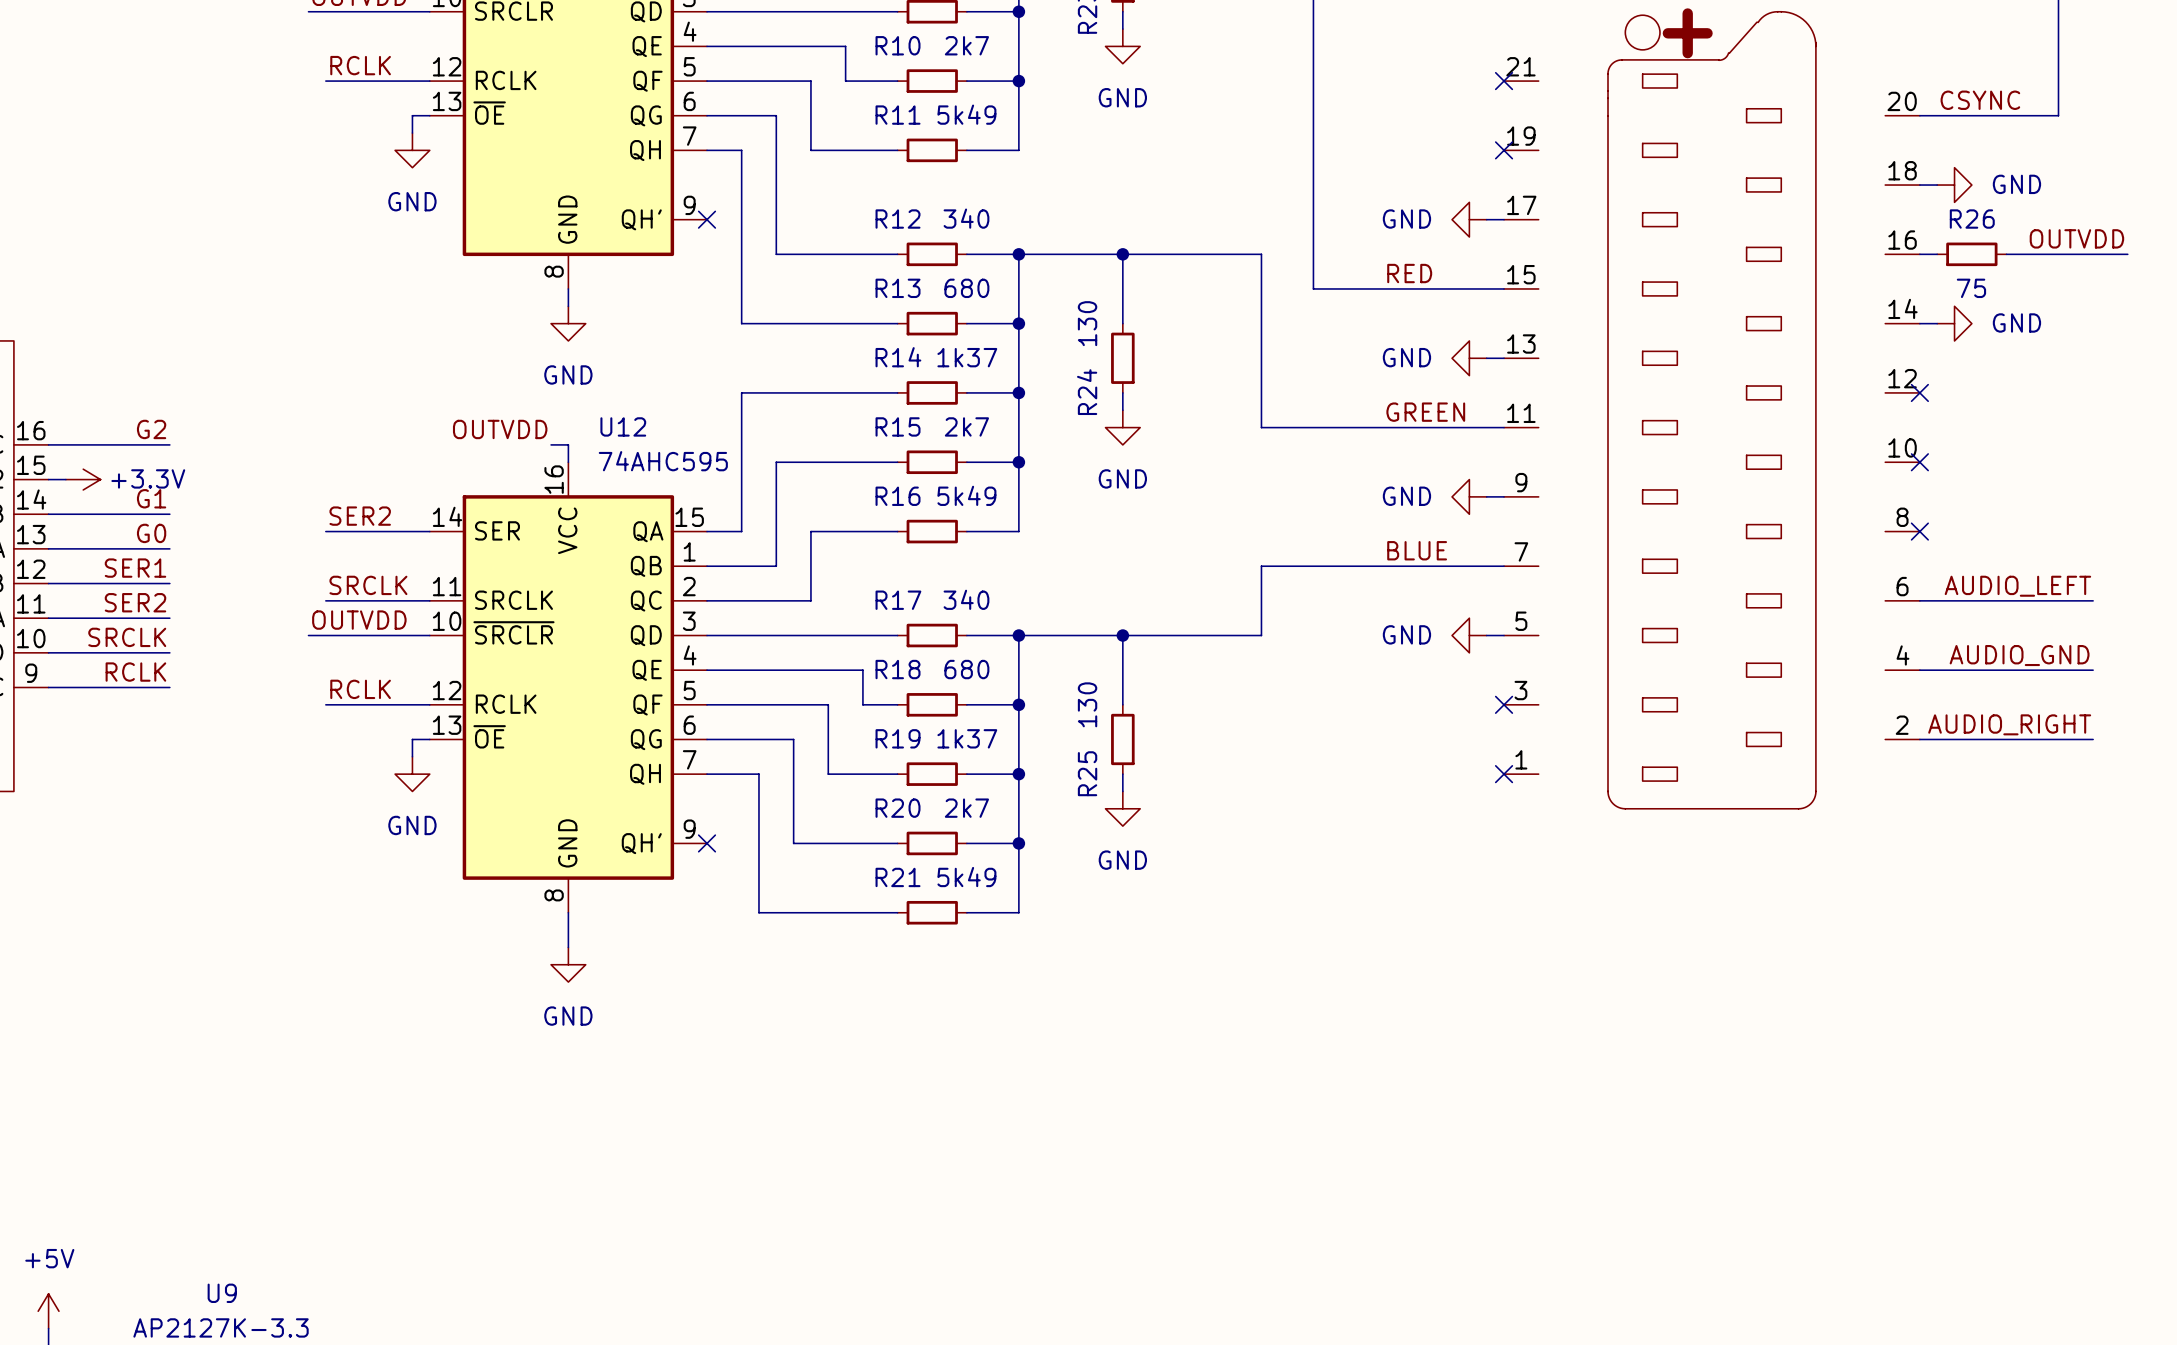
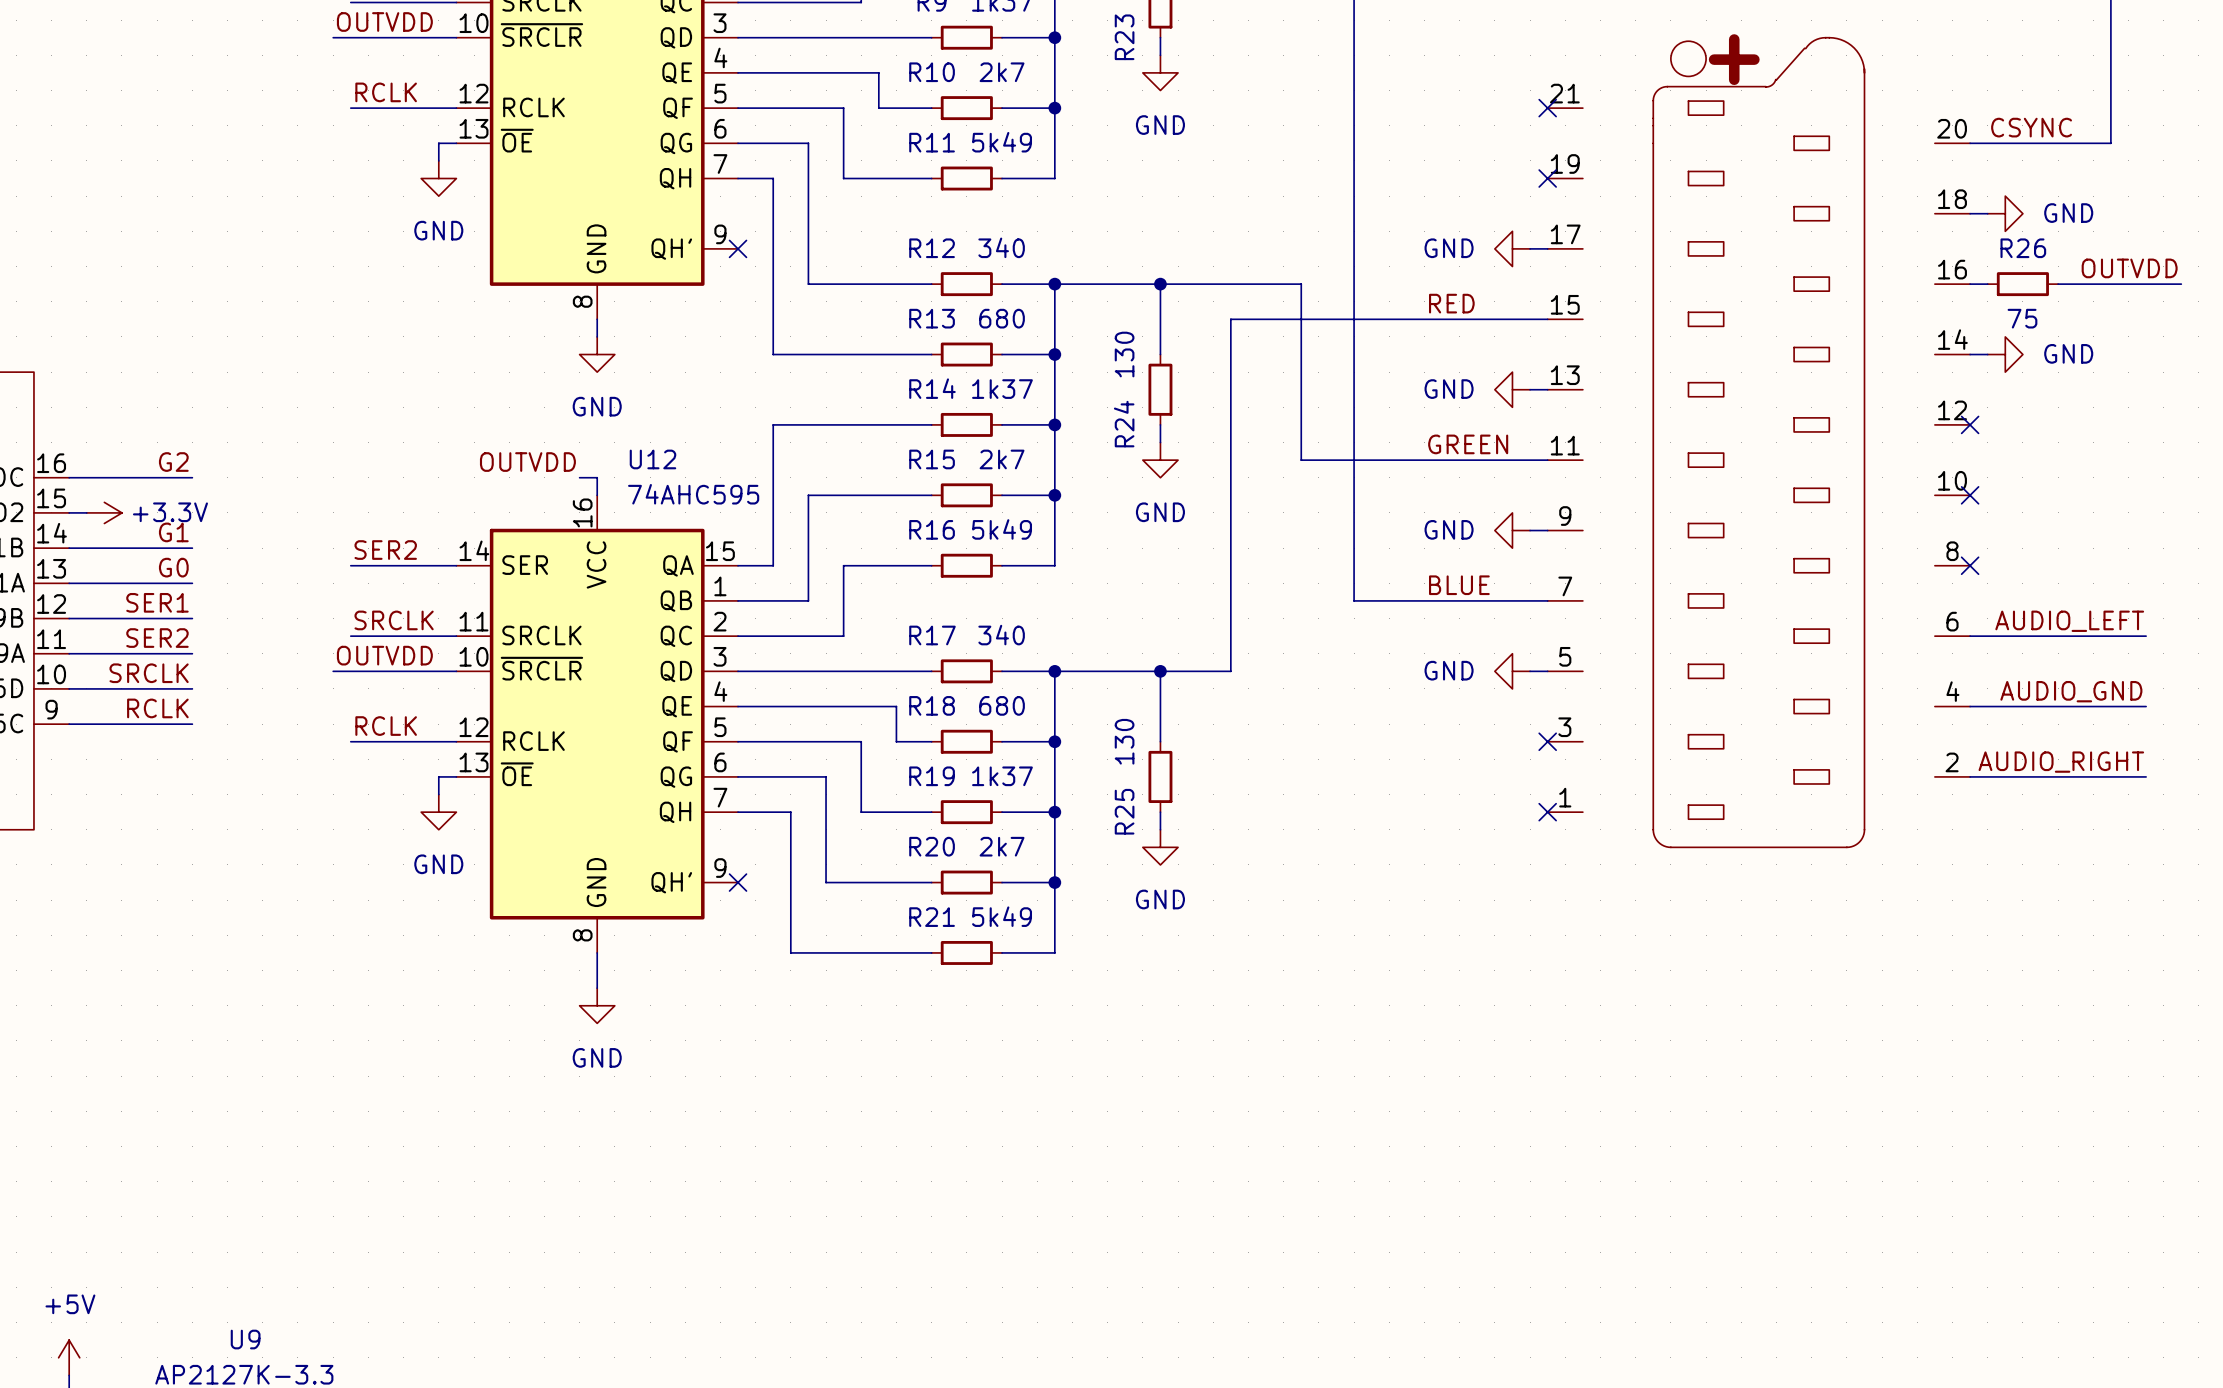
wire: (1313, 566) (1261, 566) (1261, 635) (1192, 635) -> (1354, 600) (1354, 319) (1230, 319) (1230, 671)

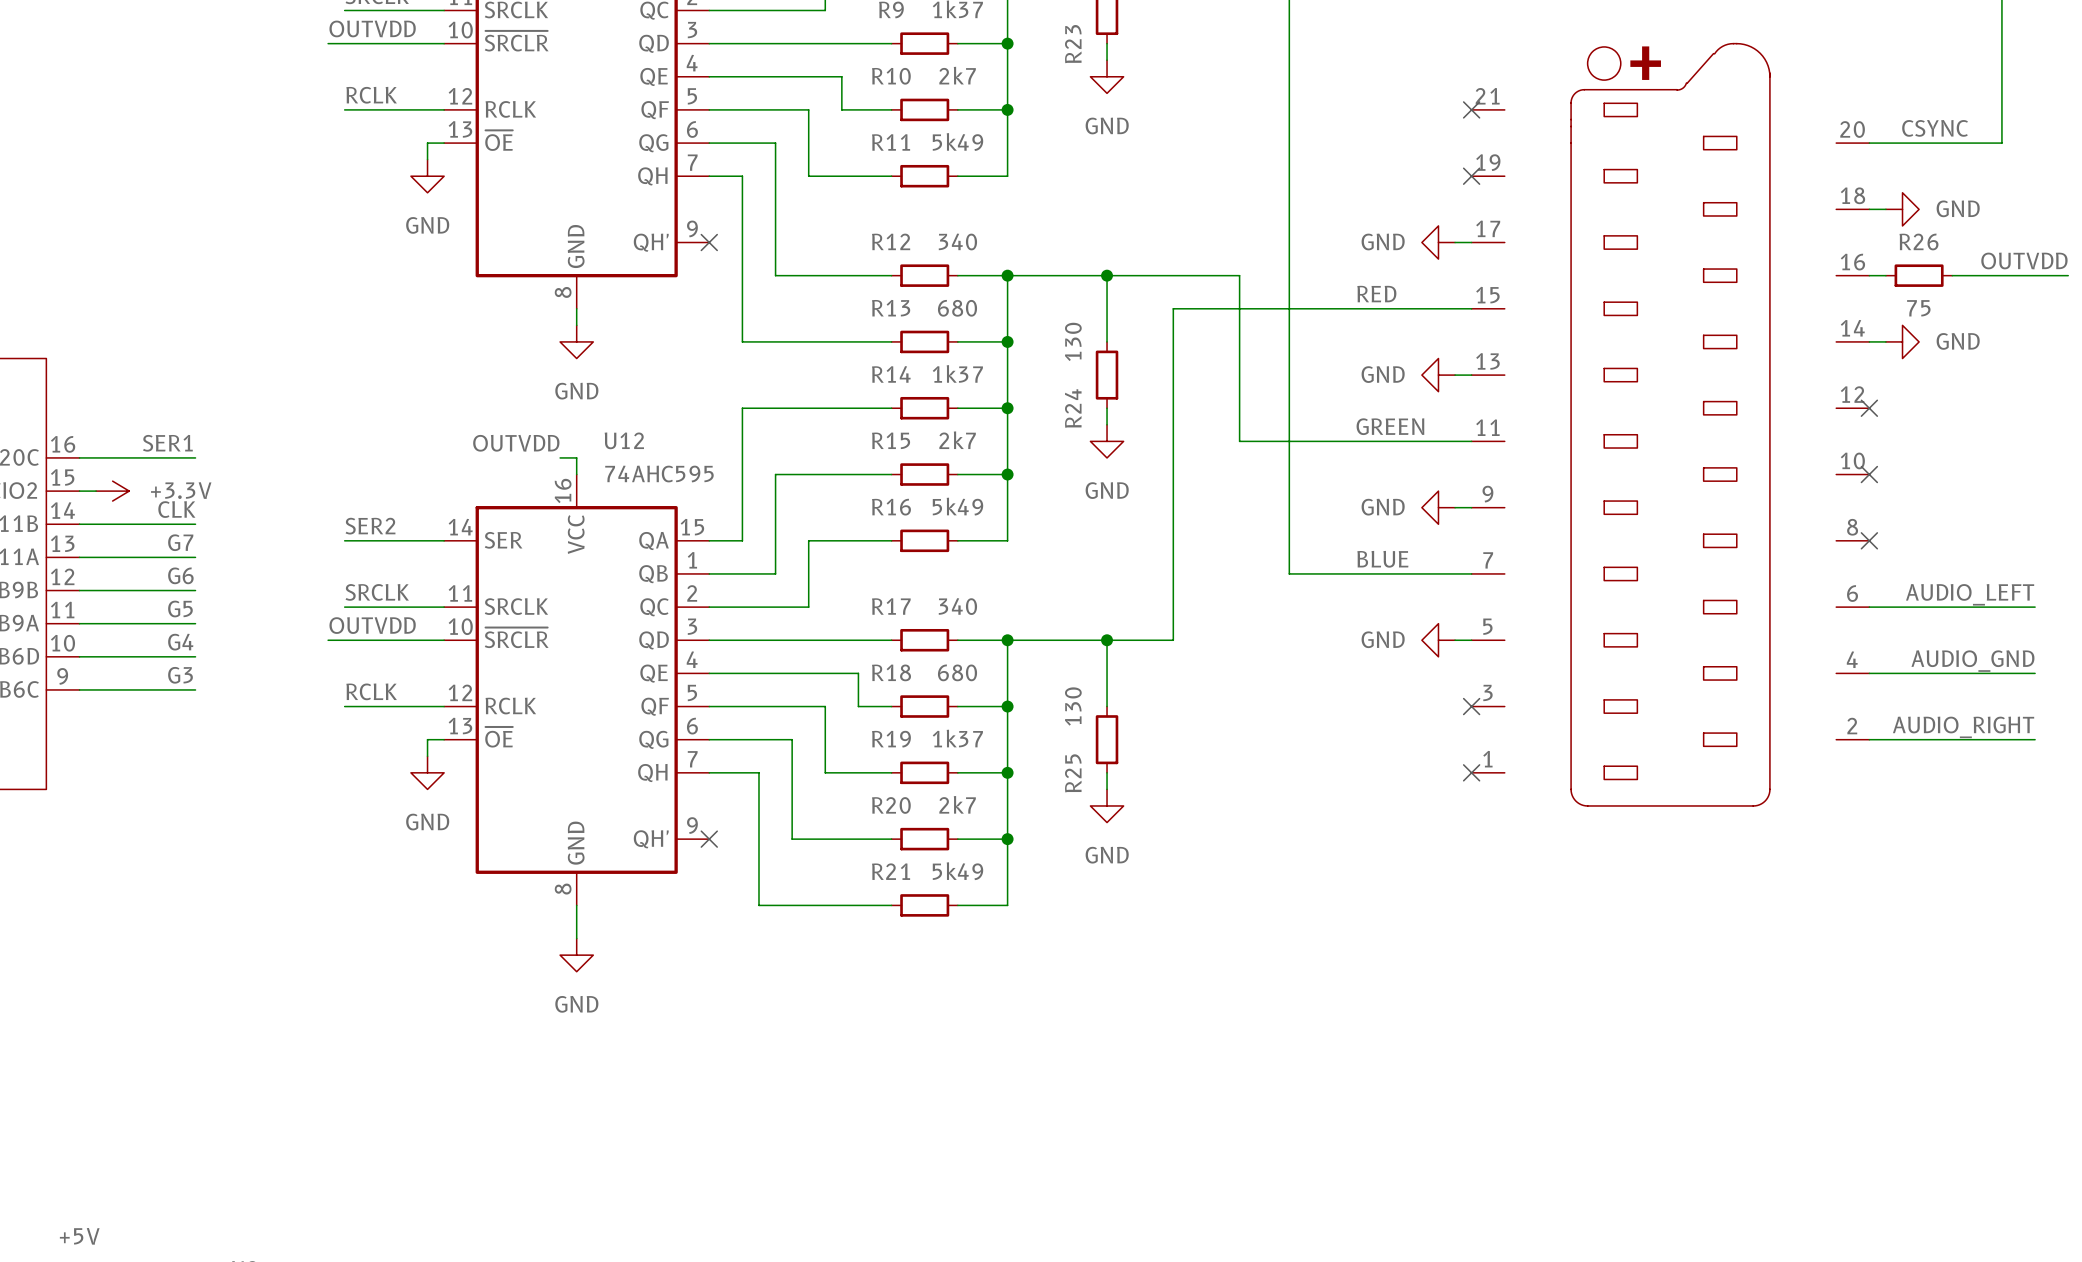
label: G2 (173, 462) -> SER1 (167, 443)
label: G1 (173, 532) -> CLK (176, 509)
label: G0 (173, 567) -> G7 (180, 542)
label: SER1 (157, 602) -> G6 (180, 575)
label: SER2 (157, 638) -> G5 (180, 609)
label: SRCLK (149, 673) -> G4 (180, 642)
label: RCLK (157, 708) -> G3 (180, 675)

